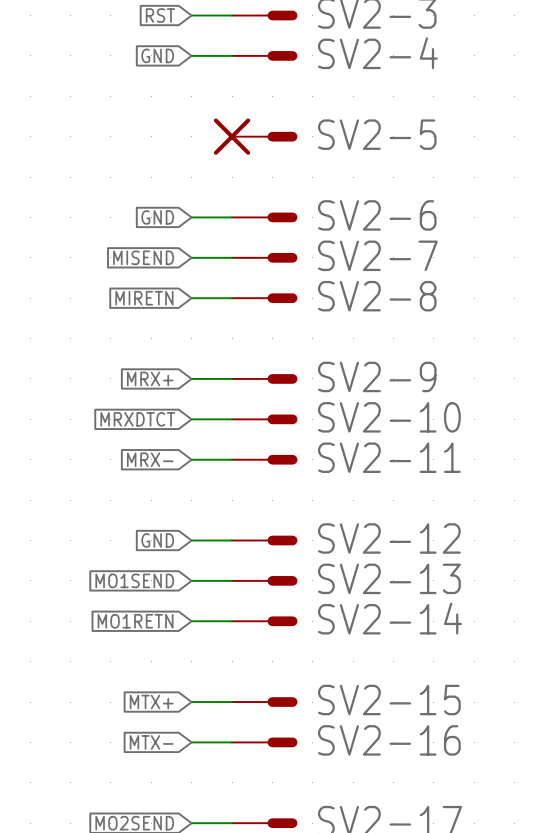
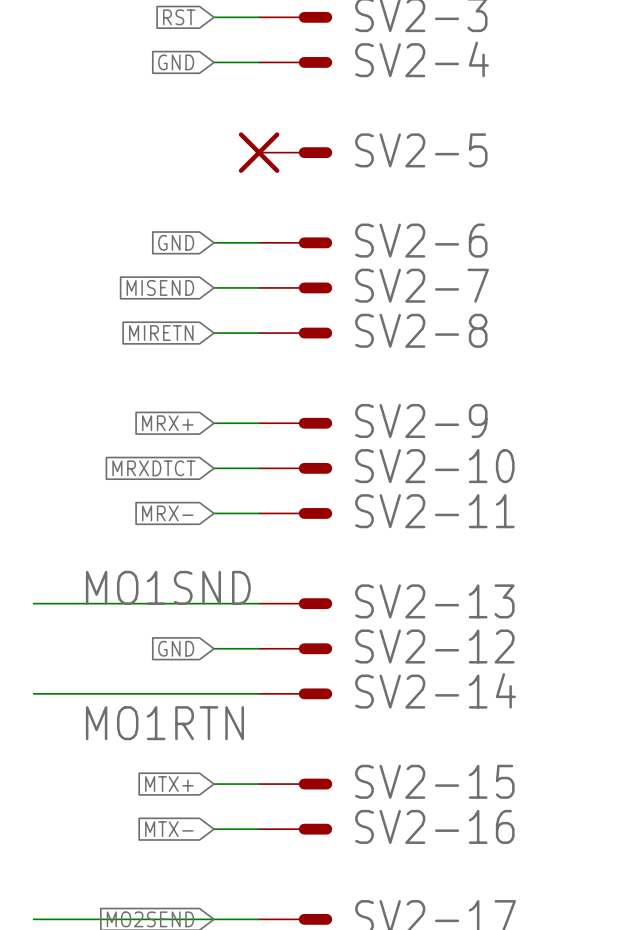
label: none -> MO1SND (168, 587)
SV2-12 name: SV2-12 (389, 538) -> SV2-13 (434, 601)
wire: none -> (33, 603) (214, 603)
global label: GND (157, 540) -> none
SV2-13 name: SV2-13 (389, 578) -> SV2-12 (434, 646)
global label: MO1SEND (134, 580) -> GND (176, 648)
wire: none -> (33, 693) (214, 693)
global label: MO1RETN (135, 621) -> none
label: none -> MO1RTN (164, 723)
wire: none -> (33, 919) (214, 919)

